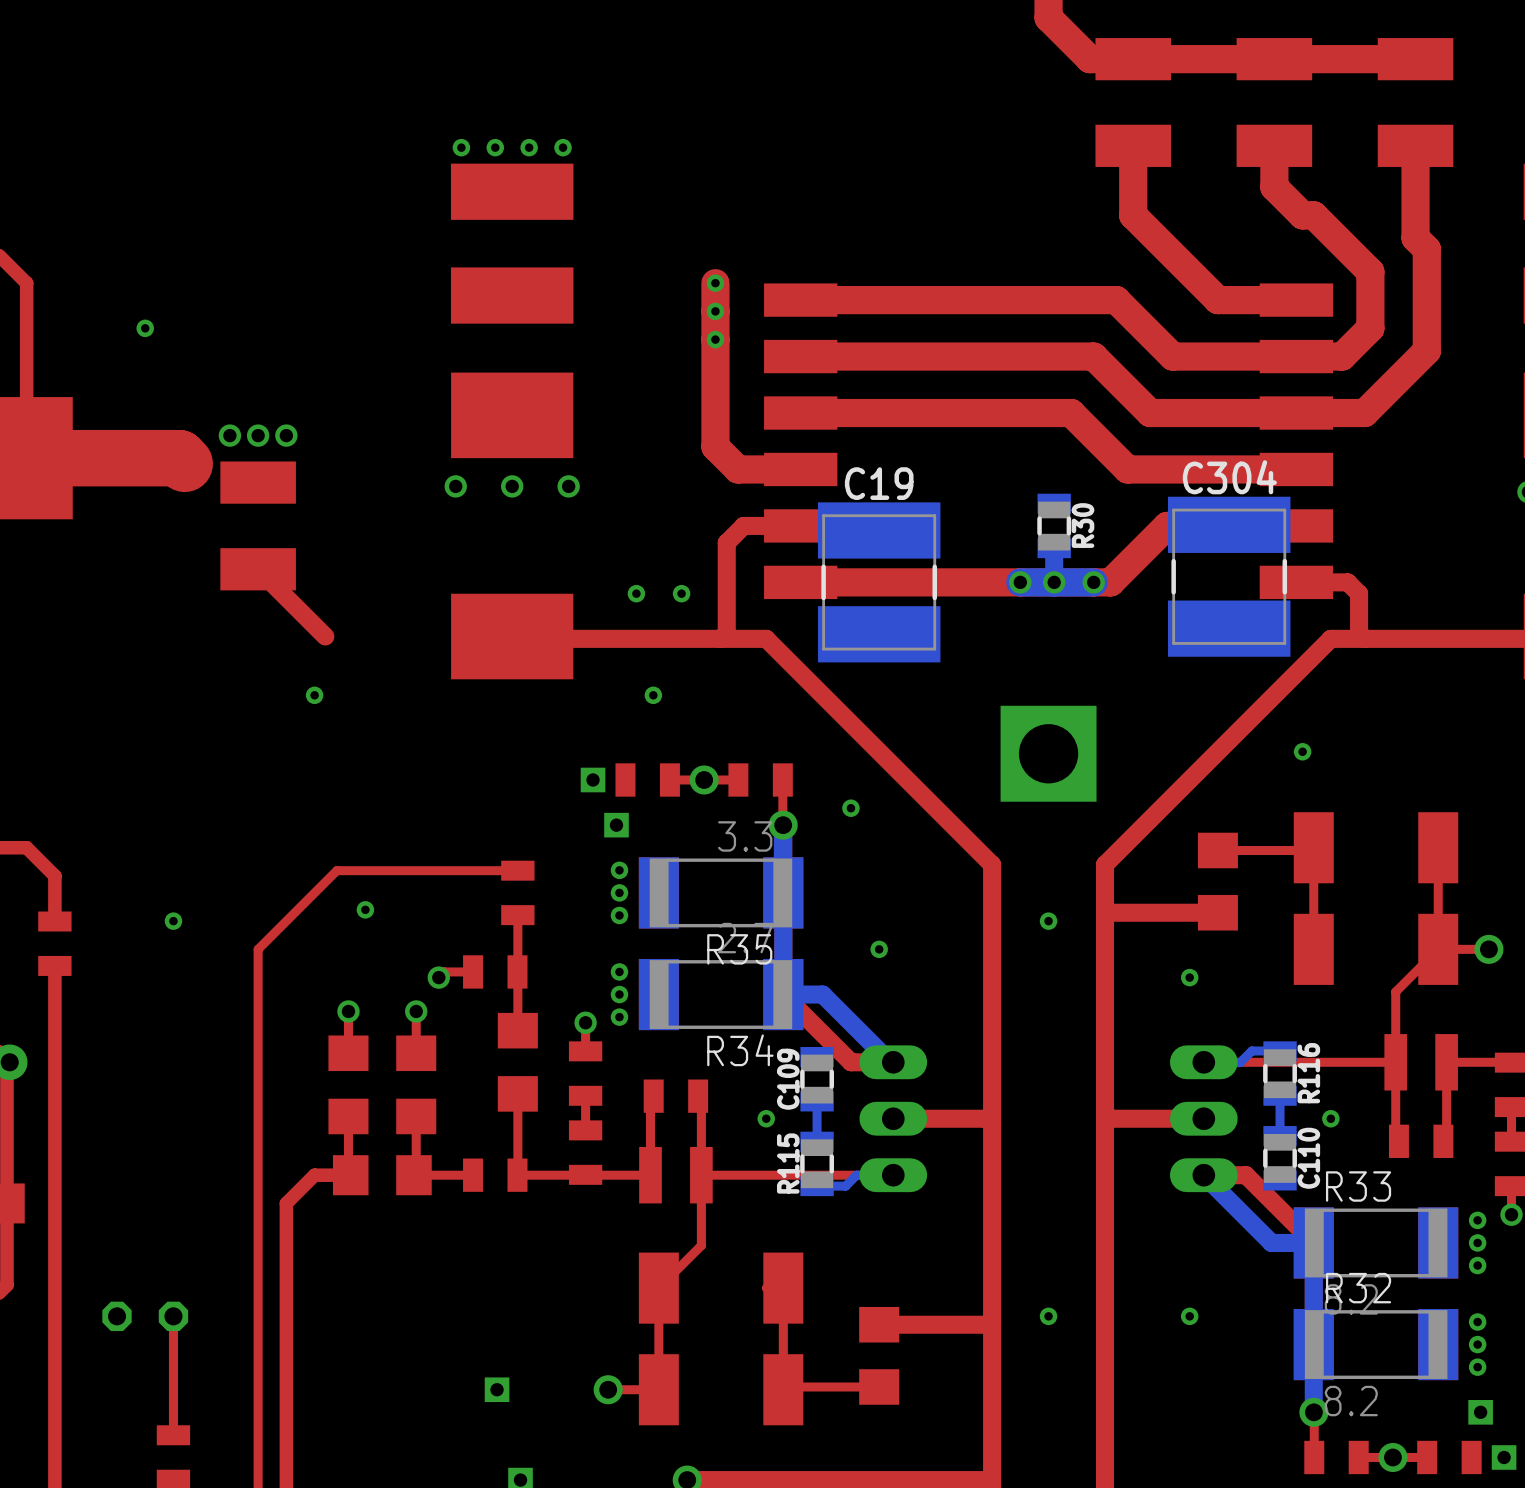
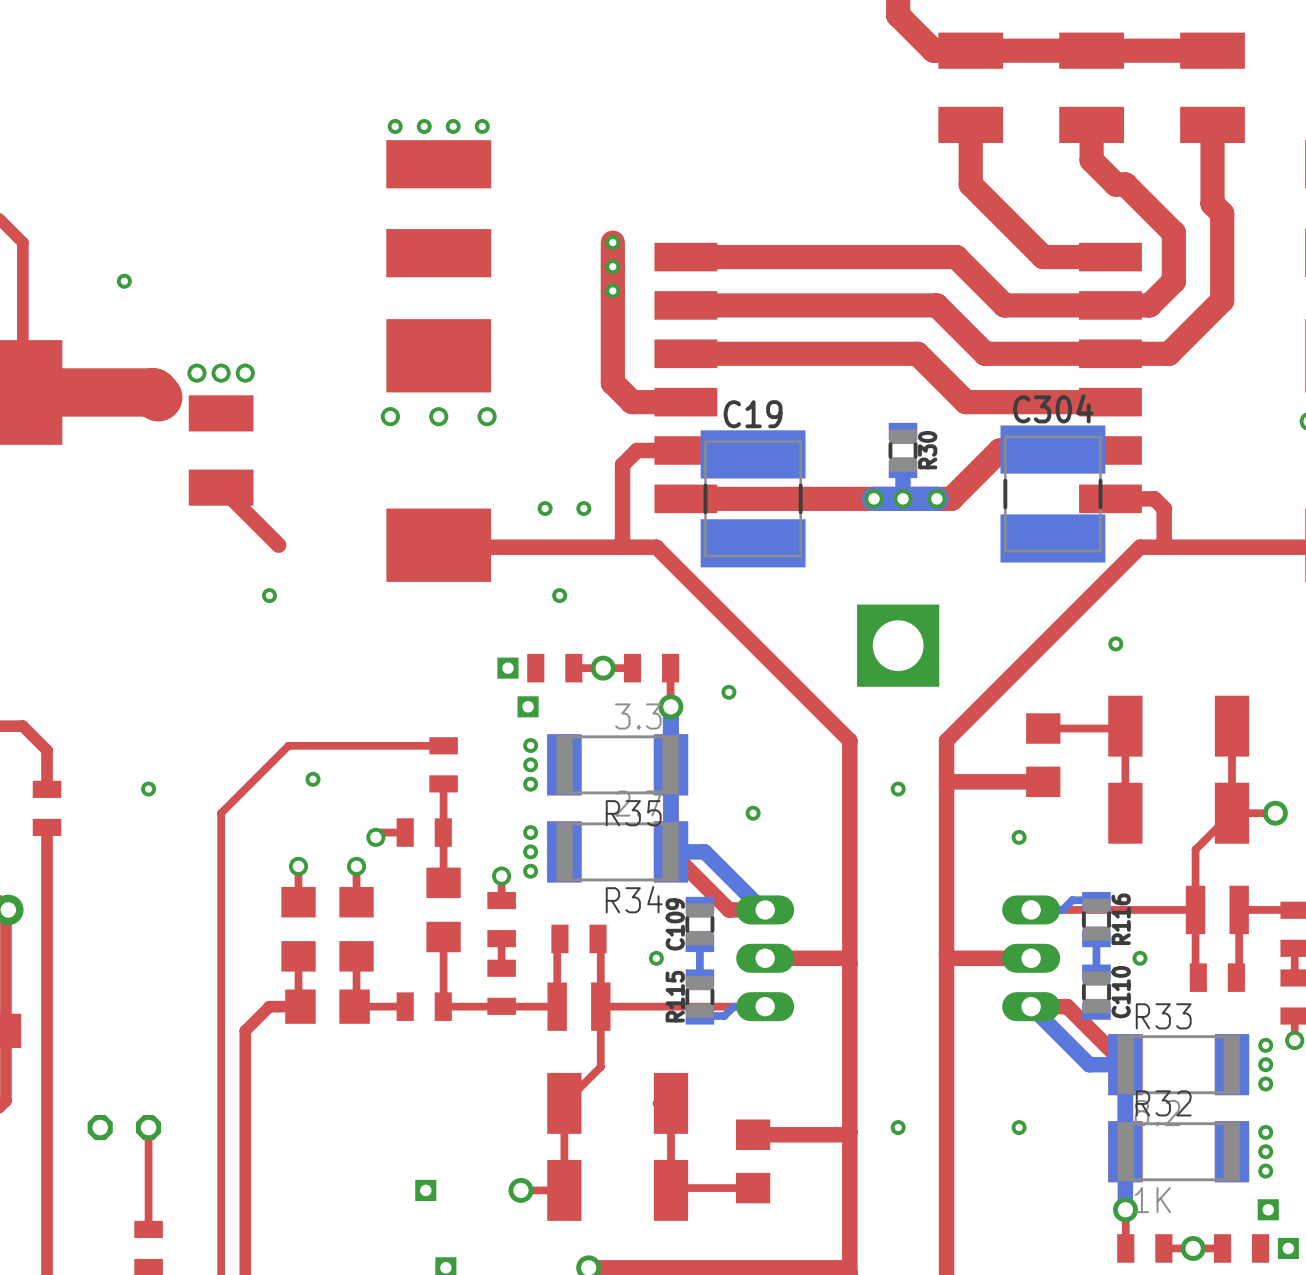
R32 value: 8.2 (1351, 1401) -> 1K (1152, 1200)

